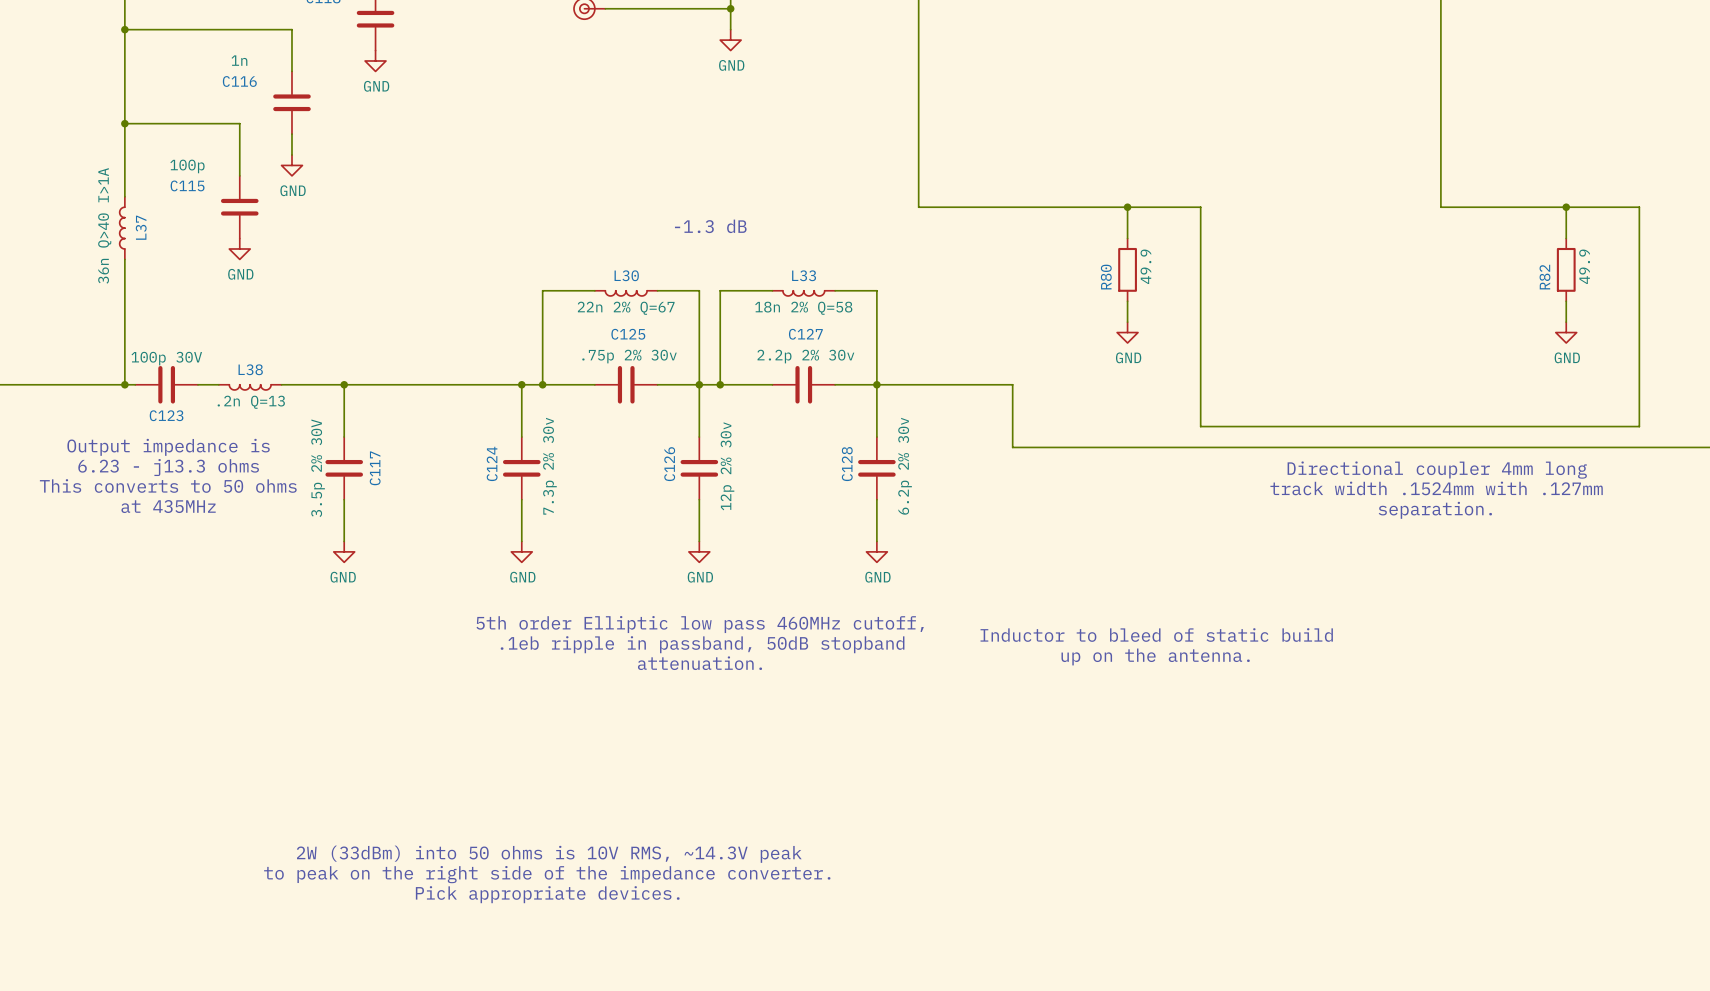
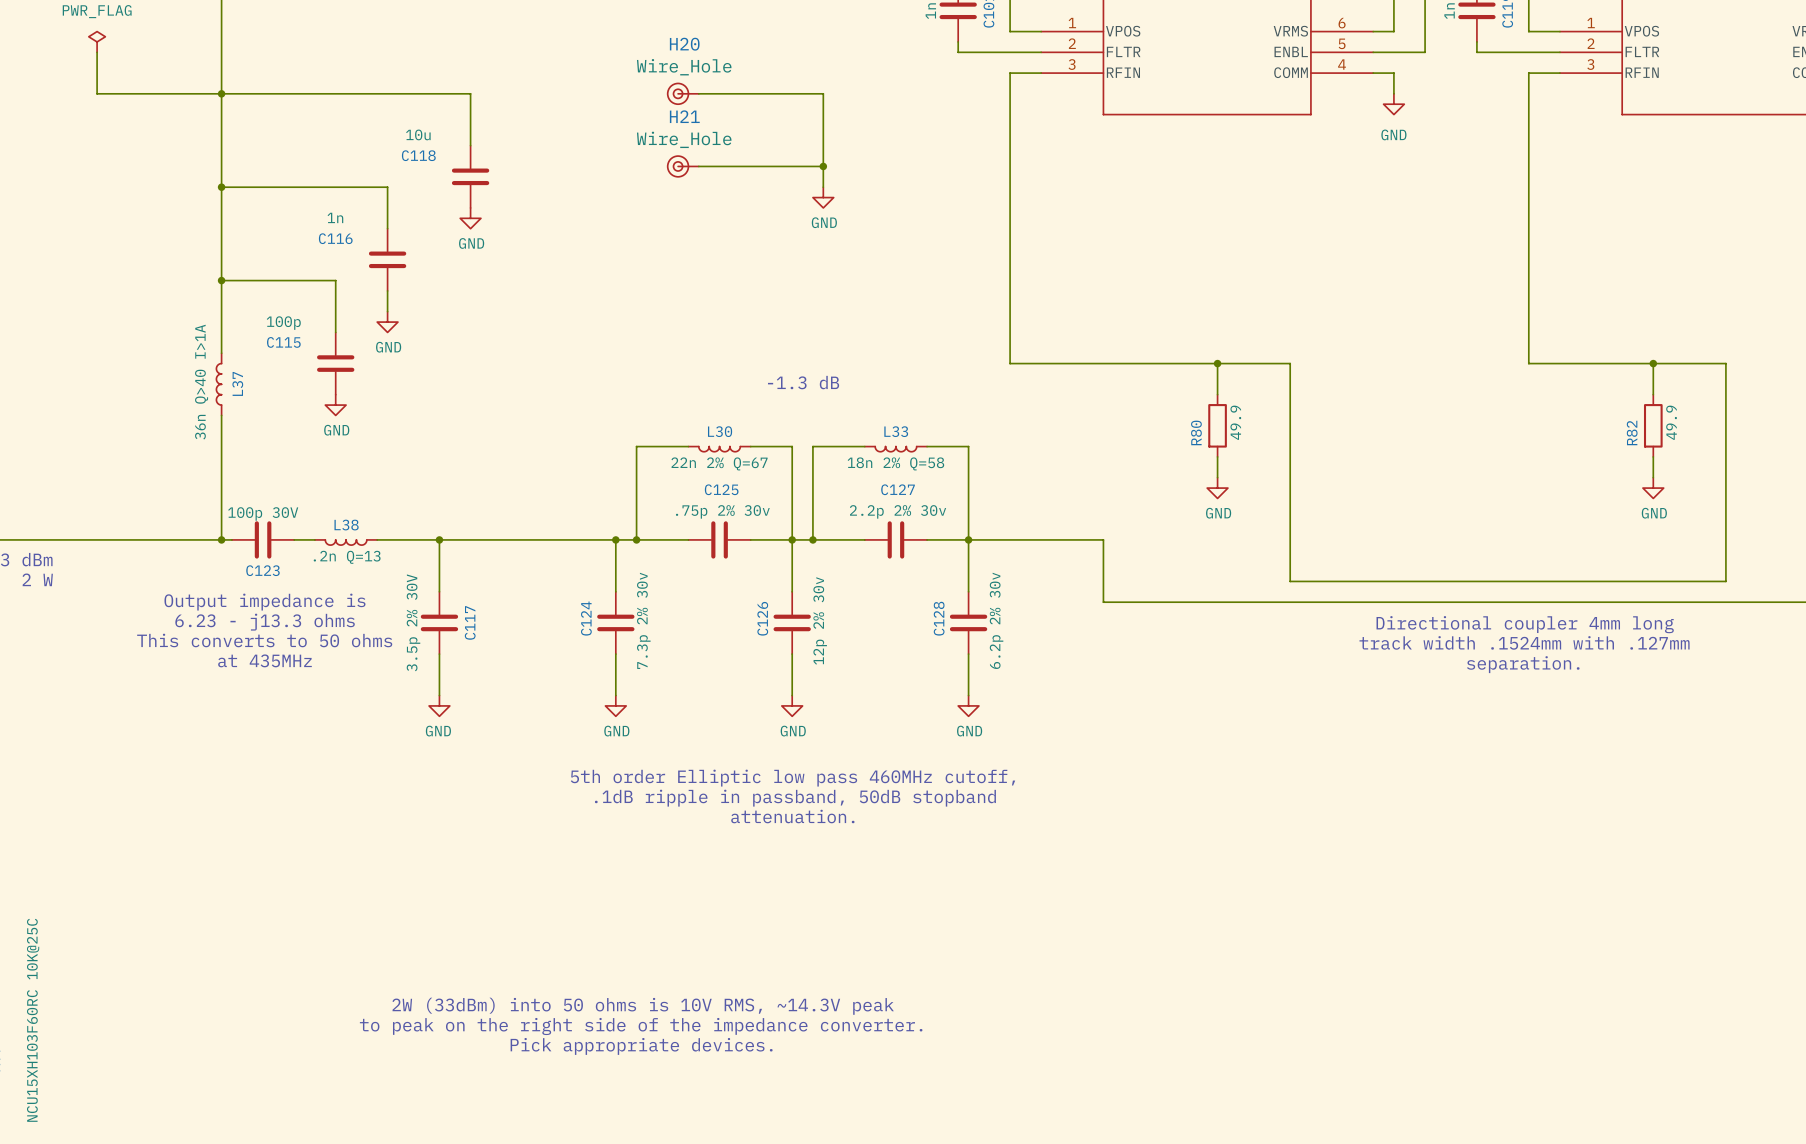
text: Inductor to bleed of static build (1156, 635) -> none
text: .1eb ripple in passband, 50dB stopband (702, 644) -> .1dB ripple in passband, 50dB stopband (795, 798)
text: up on the antenna. (1155, 656) -> none

